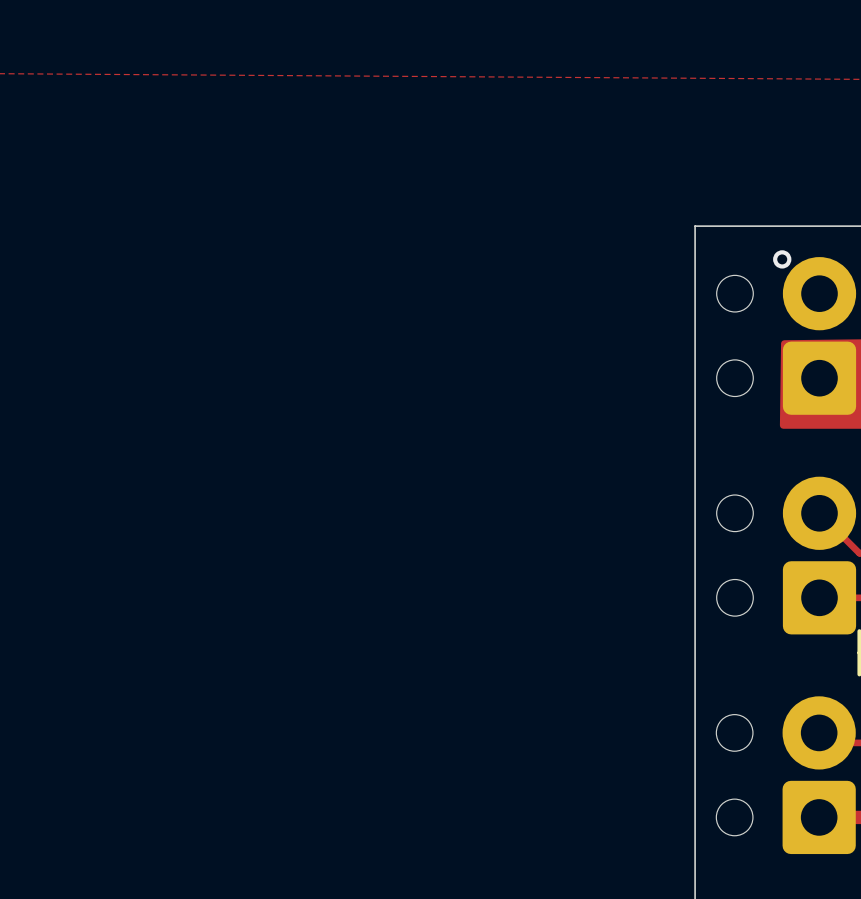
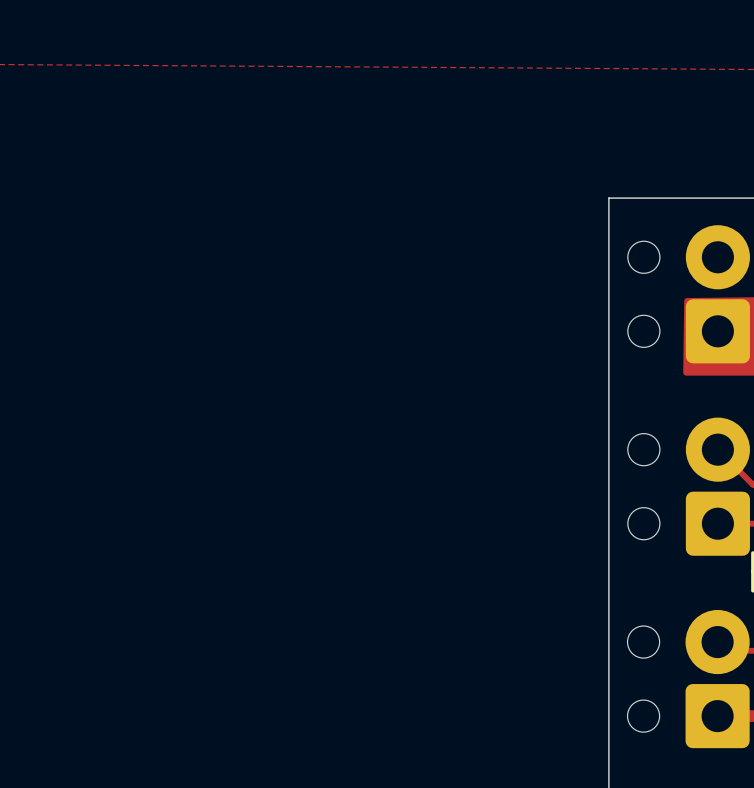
via: (782, 259) -> none

